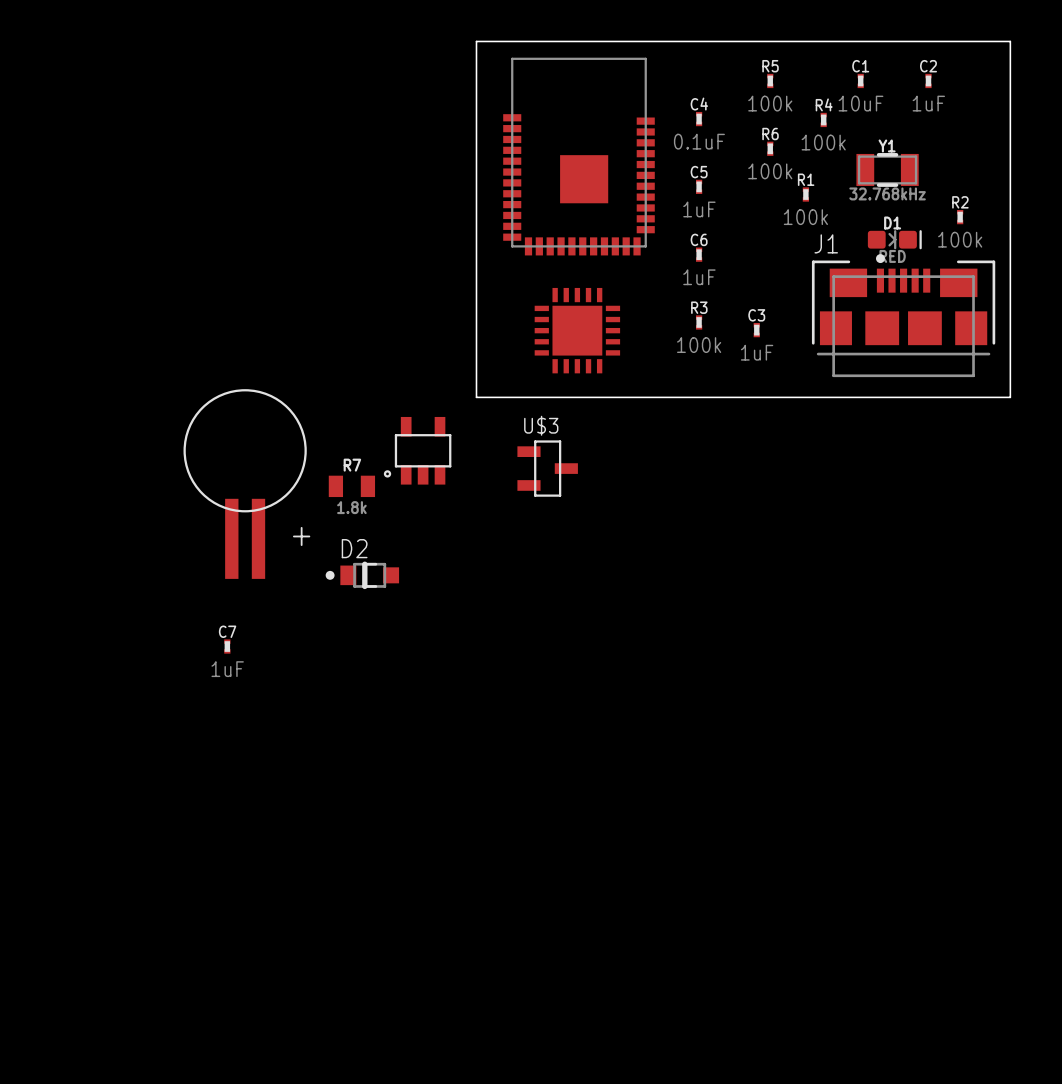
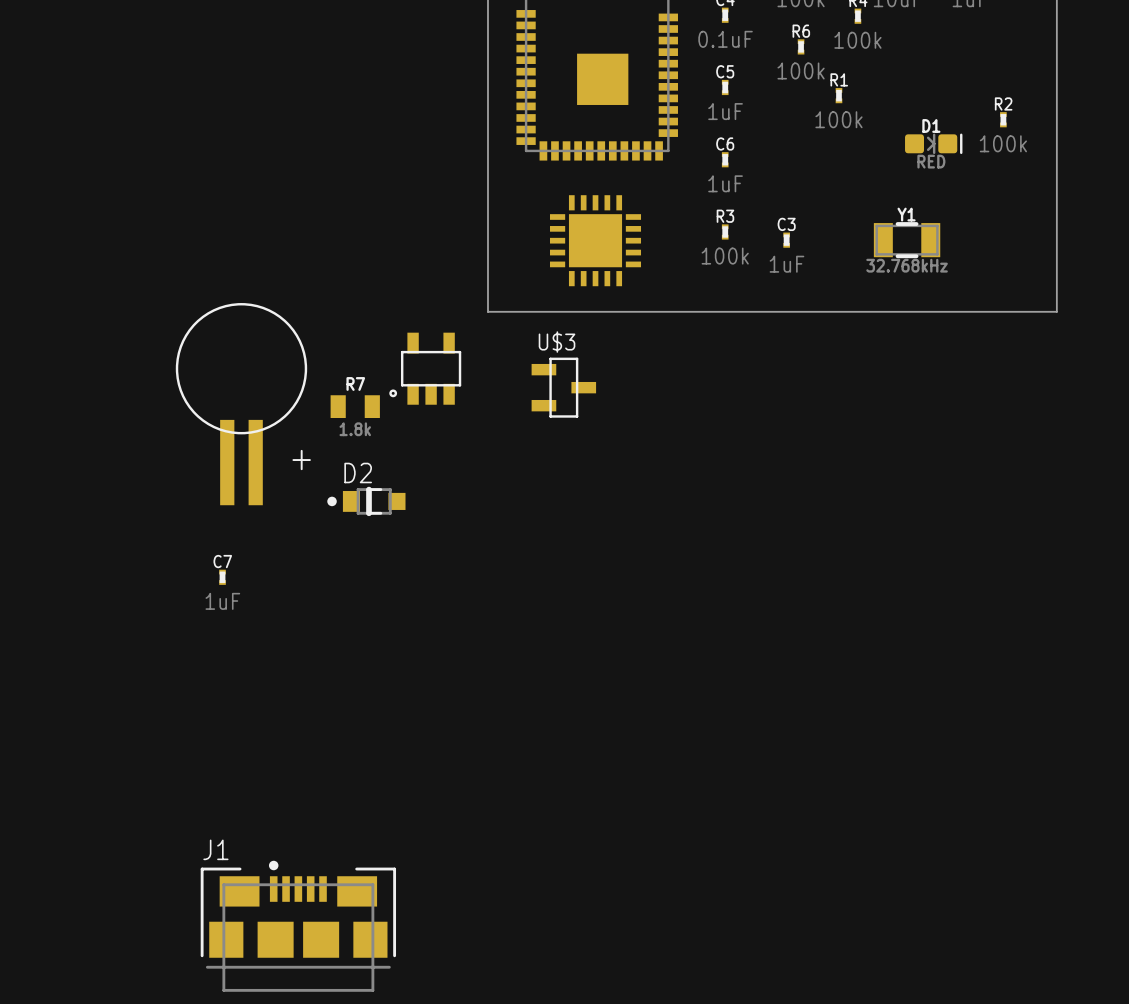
Y1 position: (887, 169) -> (907, 240)
J1 position: (903, 315) -> (298, 926)

